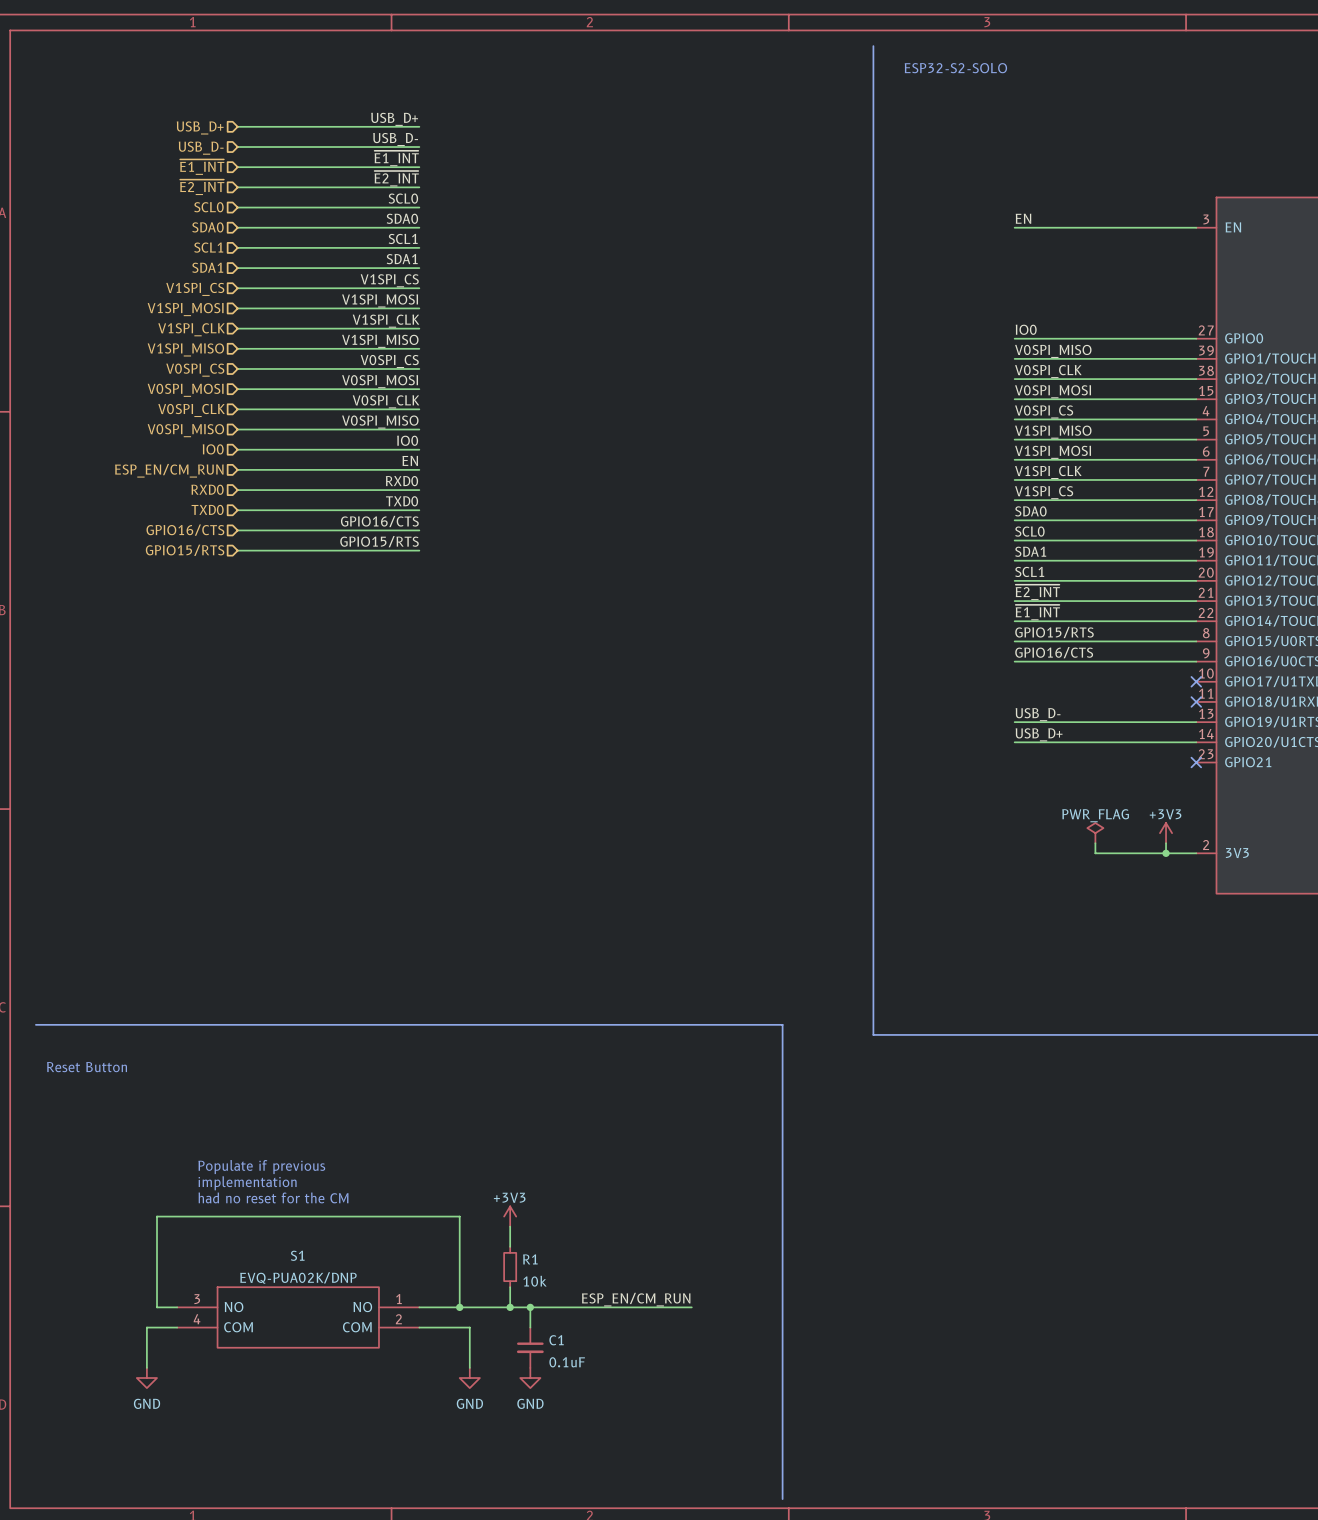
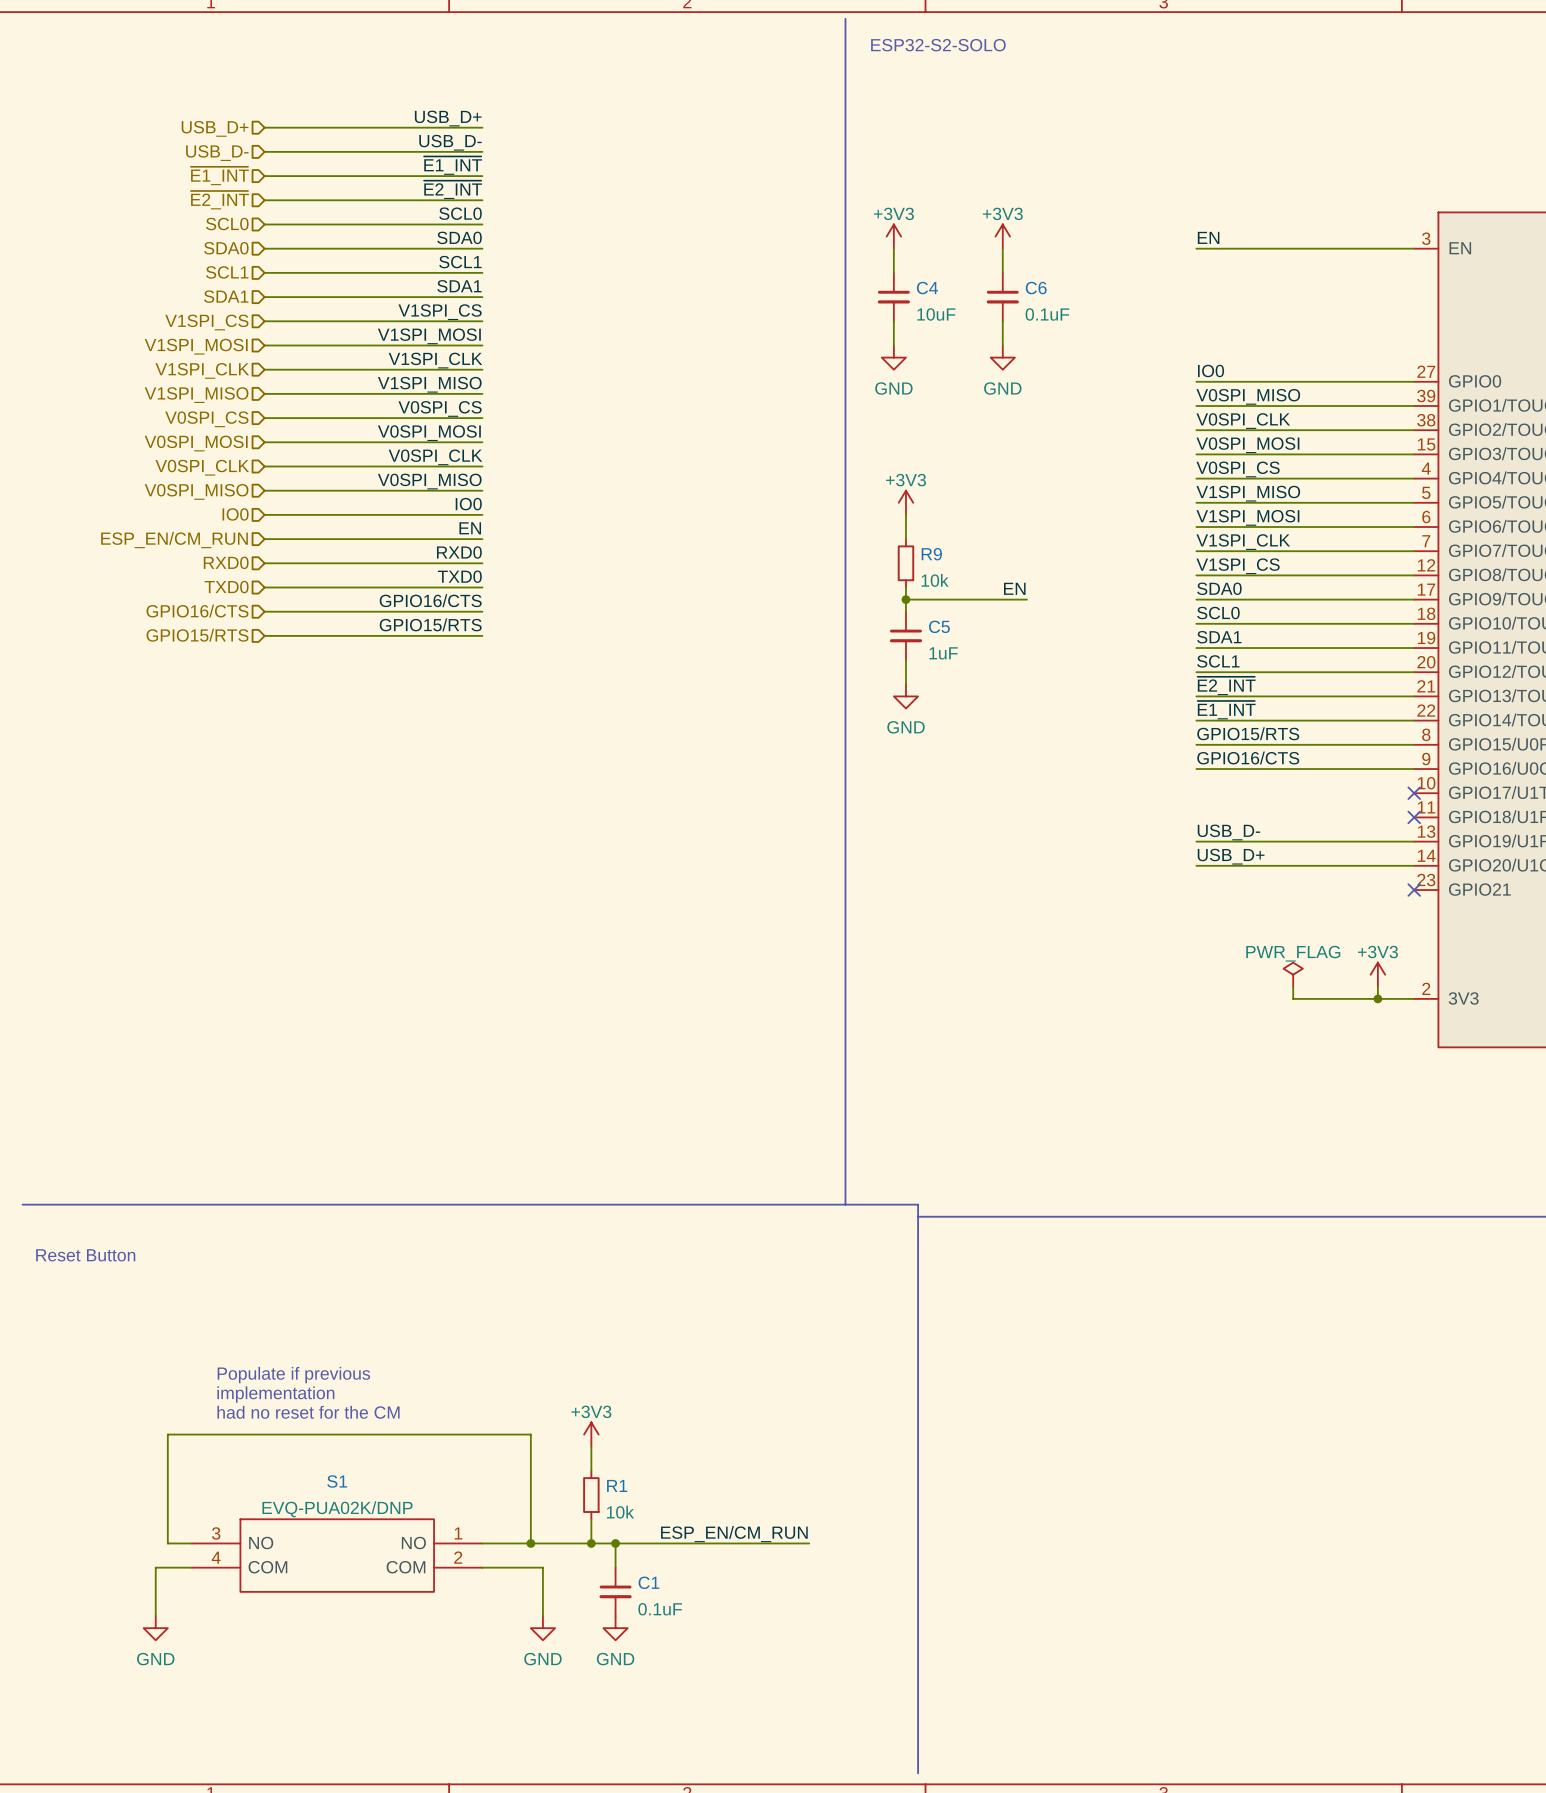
line: none -> (845, 18) (845, 1204)
line: (873, 46) (873, 1034) -> (918, 1216) (1026, 1216)
text position: ESP32-S2-SOLO (955, 68) -> ESP32-S2-SOLO (938, 45)
power symbol: none -> +3V3 (893, 236)
power symbol: none -> +3V3 (1002, 236)
wire: none -> (893, 248) (893, 272)
wire: none -> (1002, 248) (1002, 272)
C4: none -> 10uF (893, 297)
C6: none -> 0.1uF (1002, 297)
wire: none -> (893, 321) (893, 345)
wire: none -> (1002, 321) (1002, 345)
power symbol: none -> GND (893, 357)
power symbol: none -> GND (1002, 357)
power symbol: none -> +3V3 (905, 502)
wire: none -> (905, 514) (905, 539)
R9: none -> 10k (905, 563)
wire: none -> (905, 587) (905, 611)
label: none -> EN (1014, 588)
wire: none -> (905, 599) (1026, 599)
junction: none -> (905, 599)
C5: none -> 1uF (905, 635)
wire: none -> (905, 660) (905, 684)
power symbol: none -> GND (905, 696)

